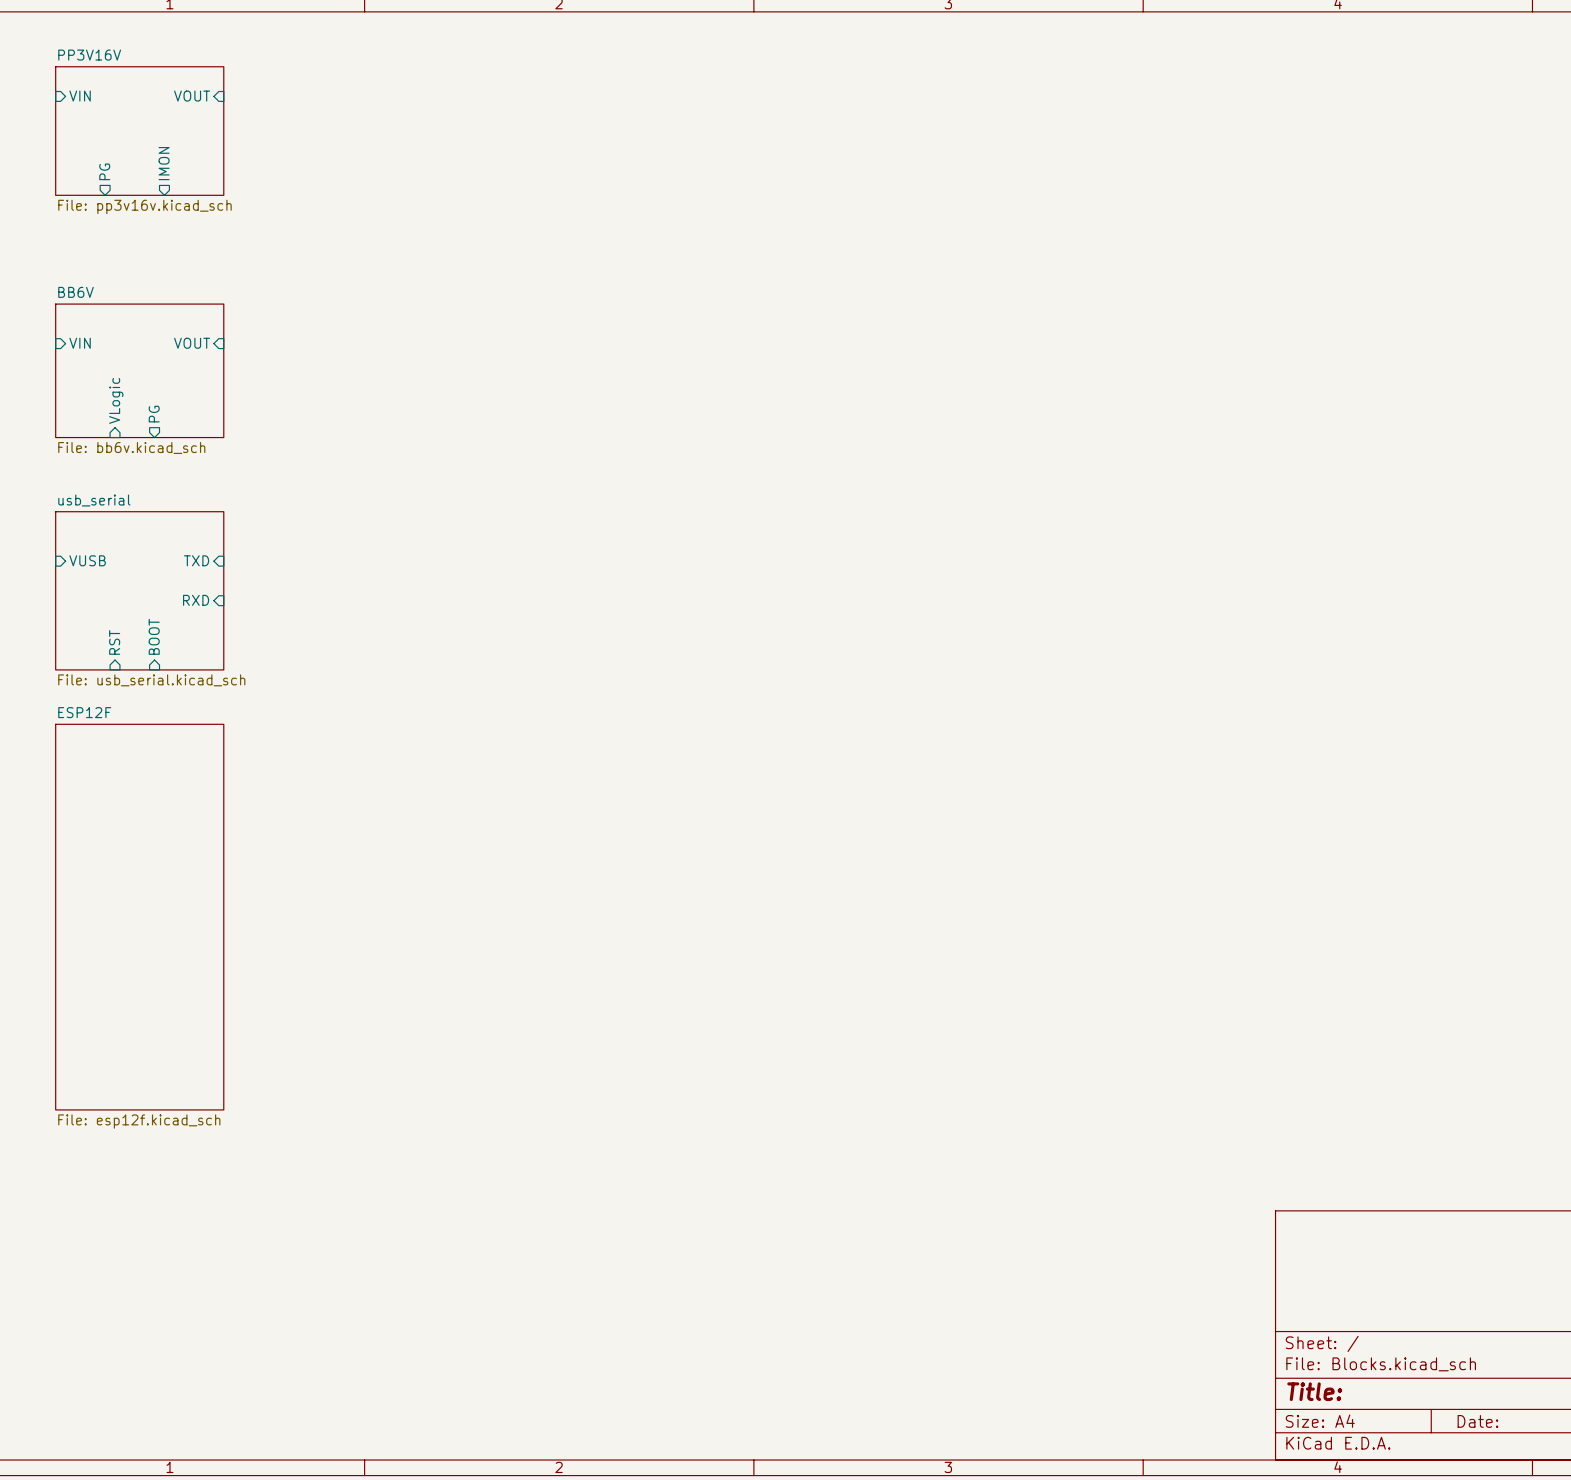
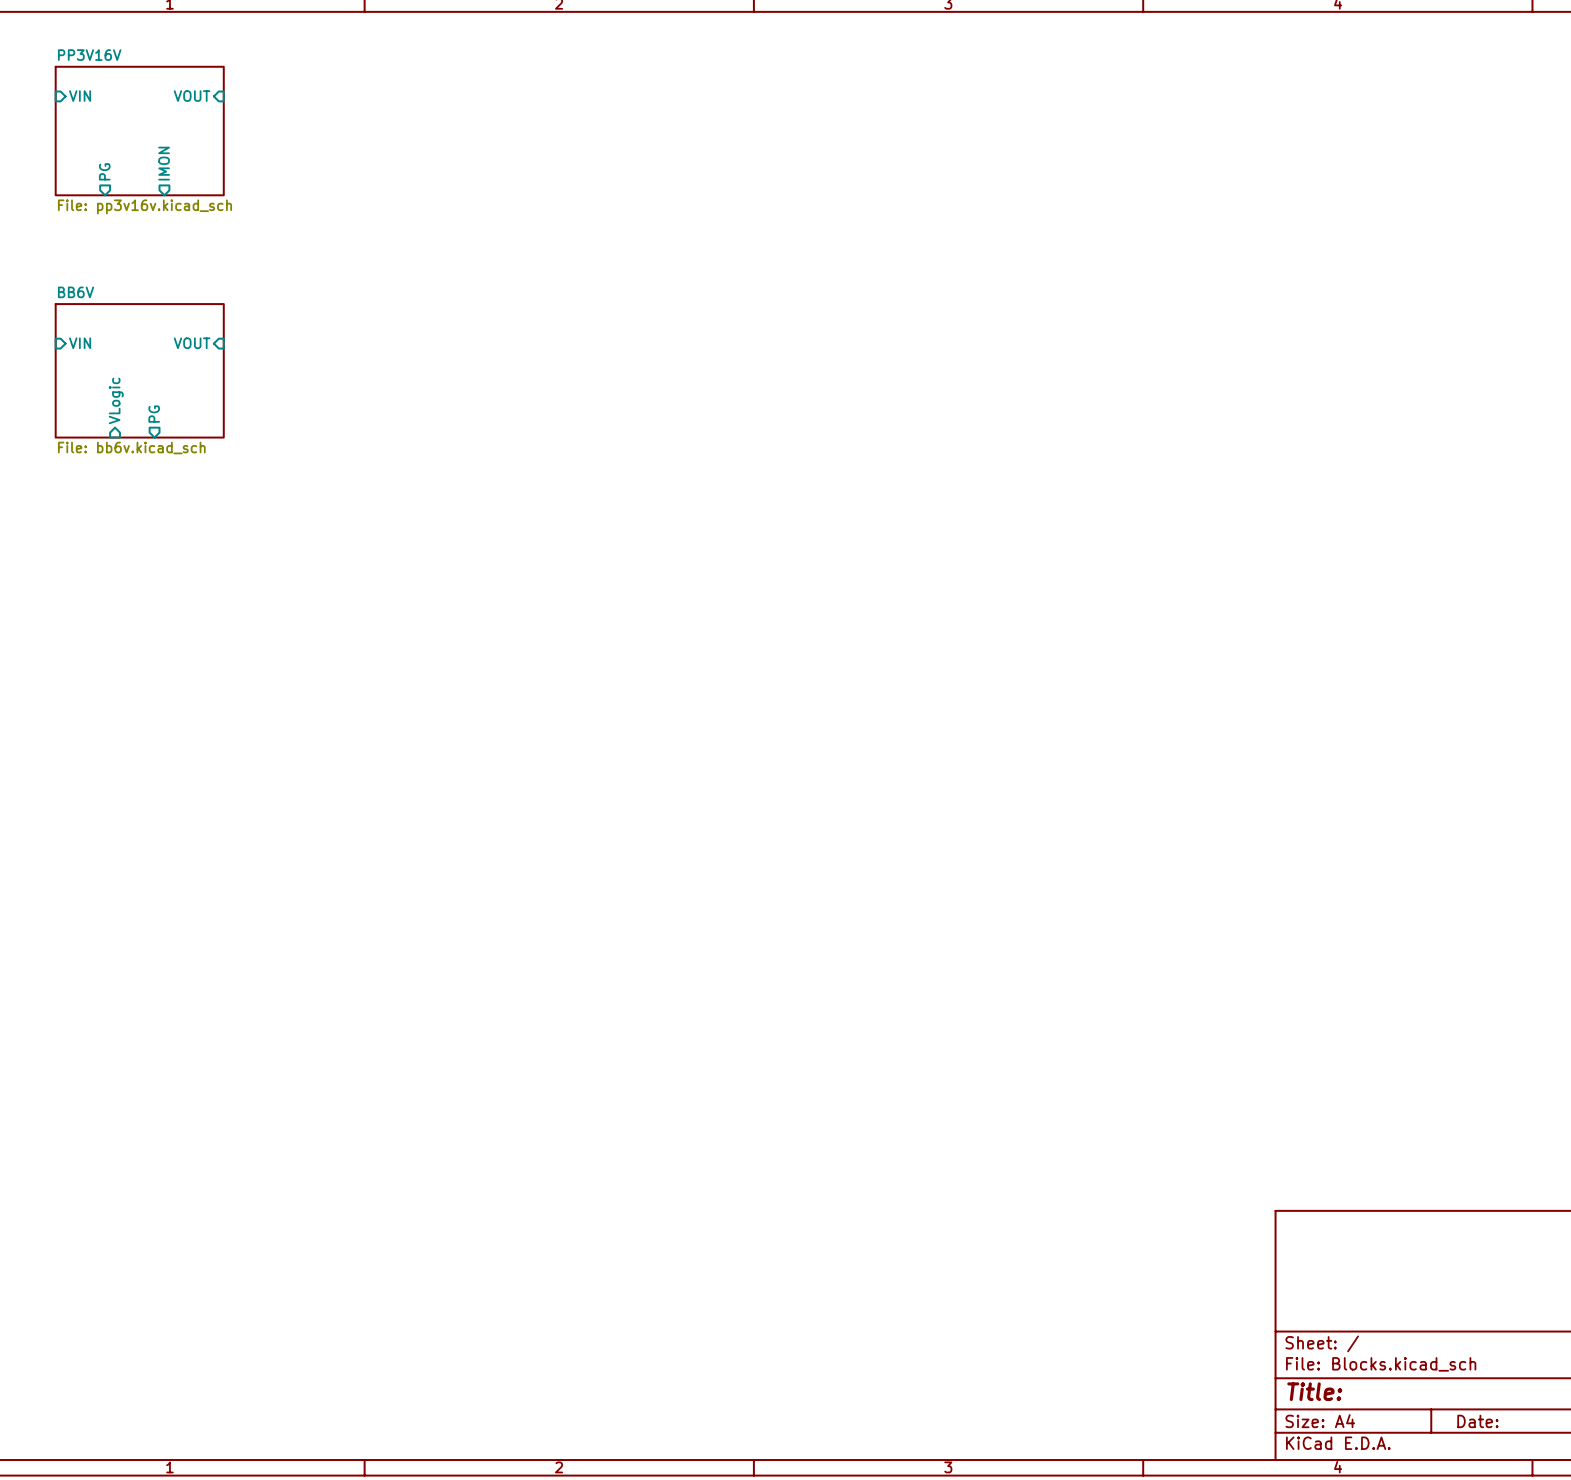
sheet pin: VUSB (87, 560) -> none
sheet pin: TXD (196, 560) -> none
sheet usb_serial: File: usb_serial.kicad_sch (139, 590) -> none
sheet pin: RXD (196, 600) -> none
sheet pin: BOOT (154, 636) -> none
sheet pin: RST (114, 642) -> none
sheet ESP12F: File: esp12f.kicad_sch (139, 917) -> none

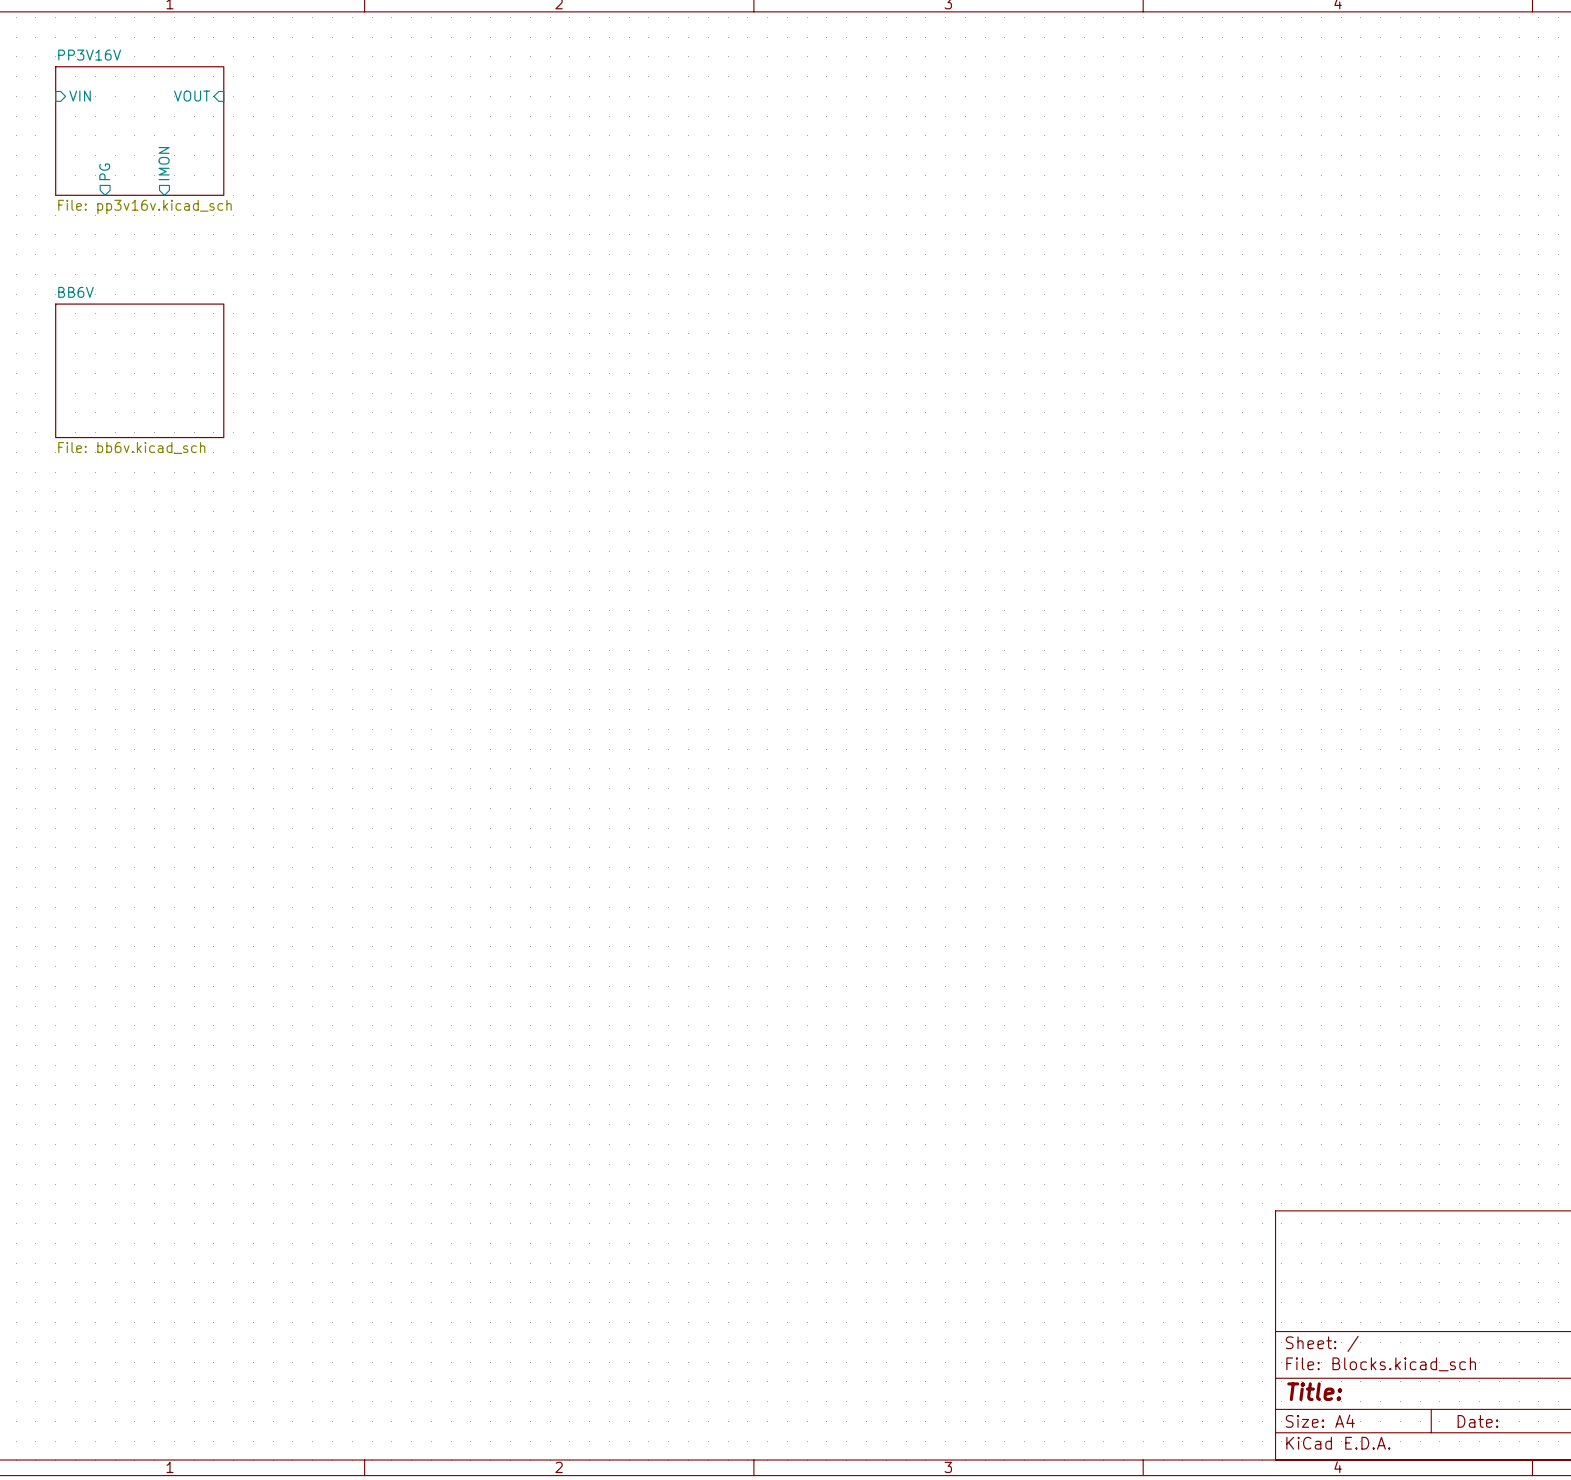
sheet pin: VIN (80, 343) -> none
sheet pin: VOUT (192, 343) -> none
sheet pin: VLogic (116, 400) -> none
sheet pin: PG (154, 414) -> none

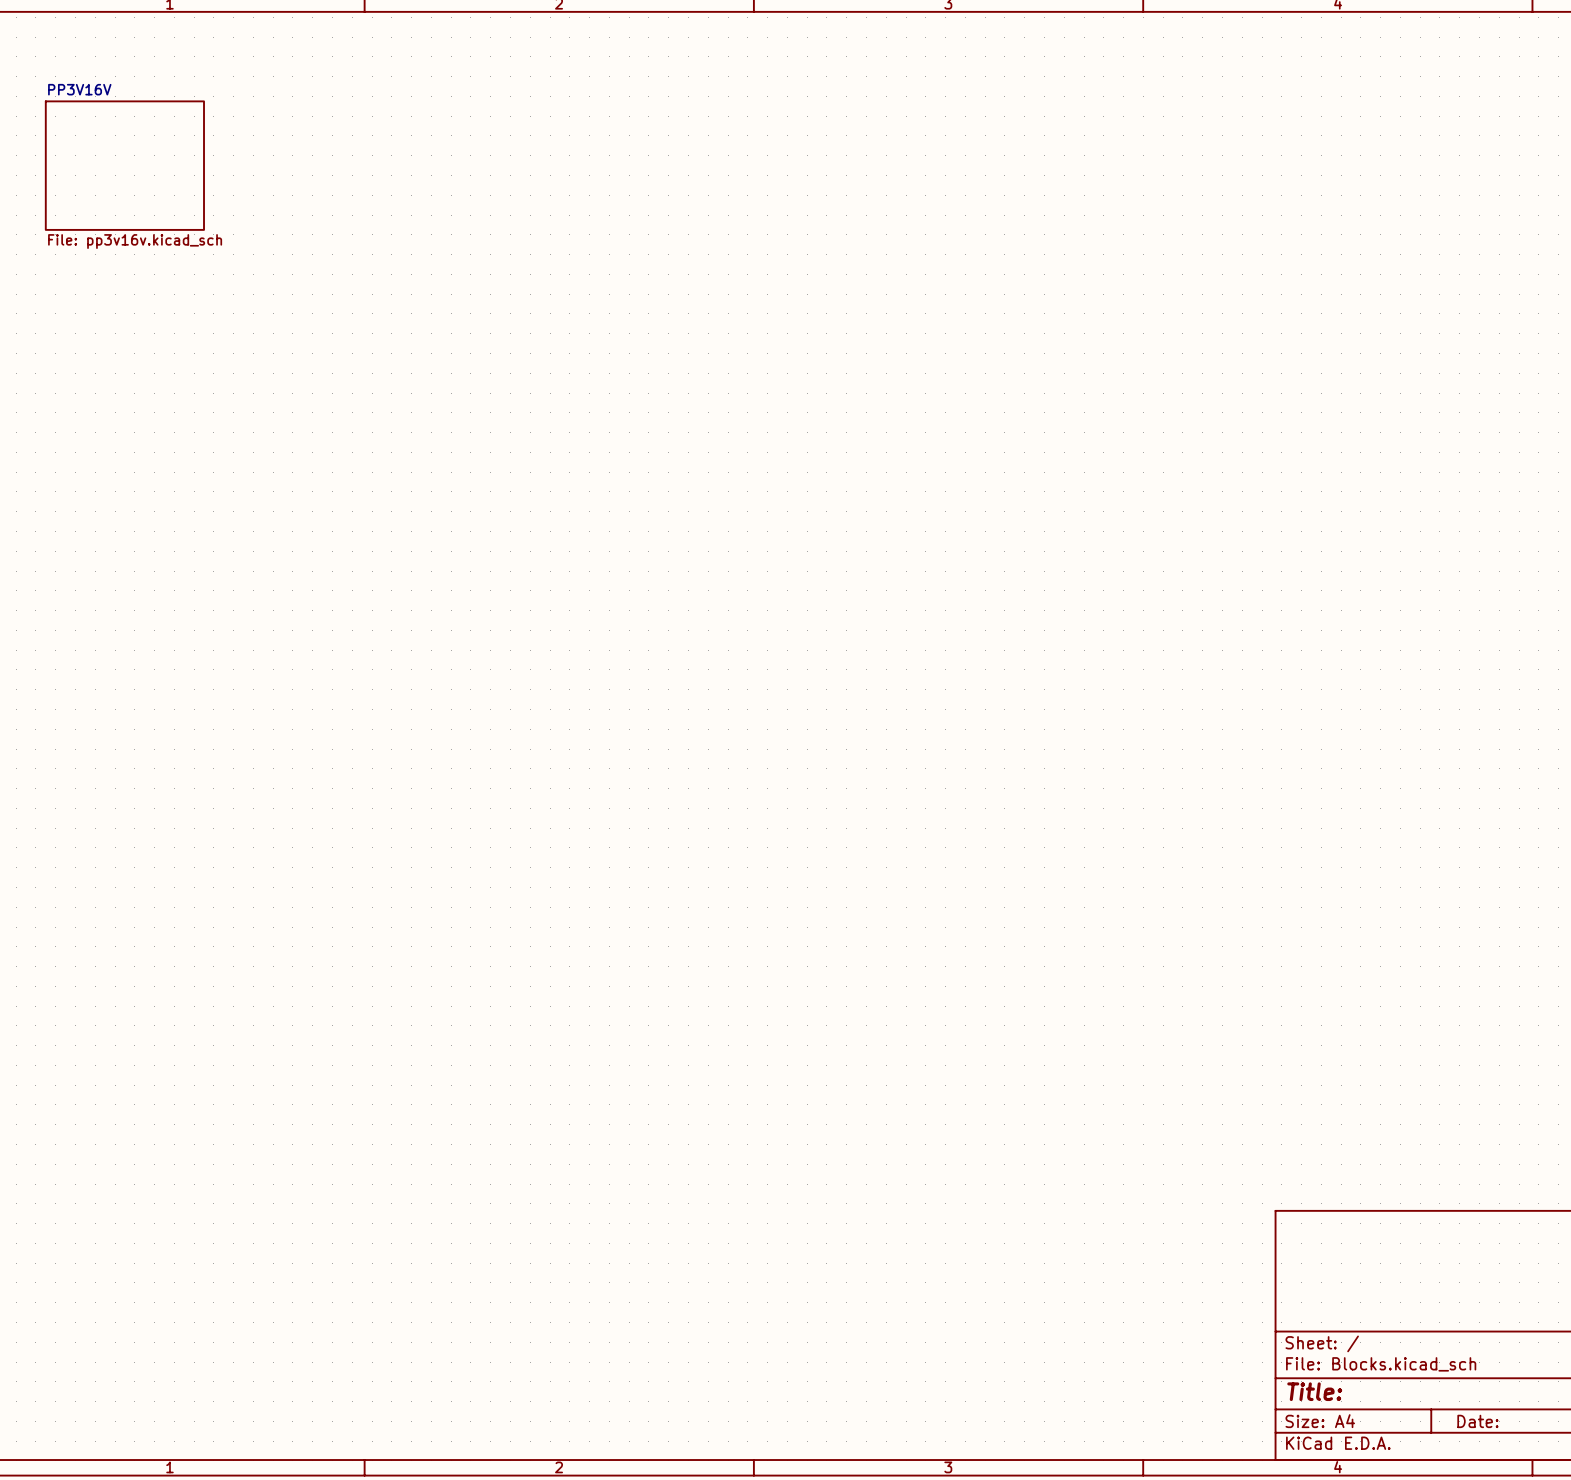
sheet PP3V16V shape: [55, 66, 225, 196] -> [45, 100, 205, 231]
sheet pin: VIN (80, 96) -> none
sheet pin: VOUT (192, 96) -> none
sheet pin: IMON (164, 163) -> none
sheet pin: PG (104, 171) -> none
sheet BB6V: File: bb6v.kicad_sch (139, 370) -> none

